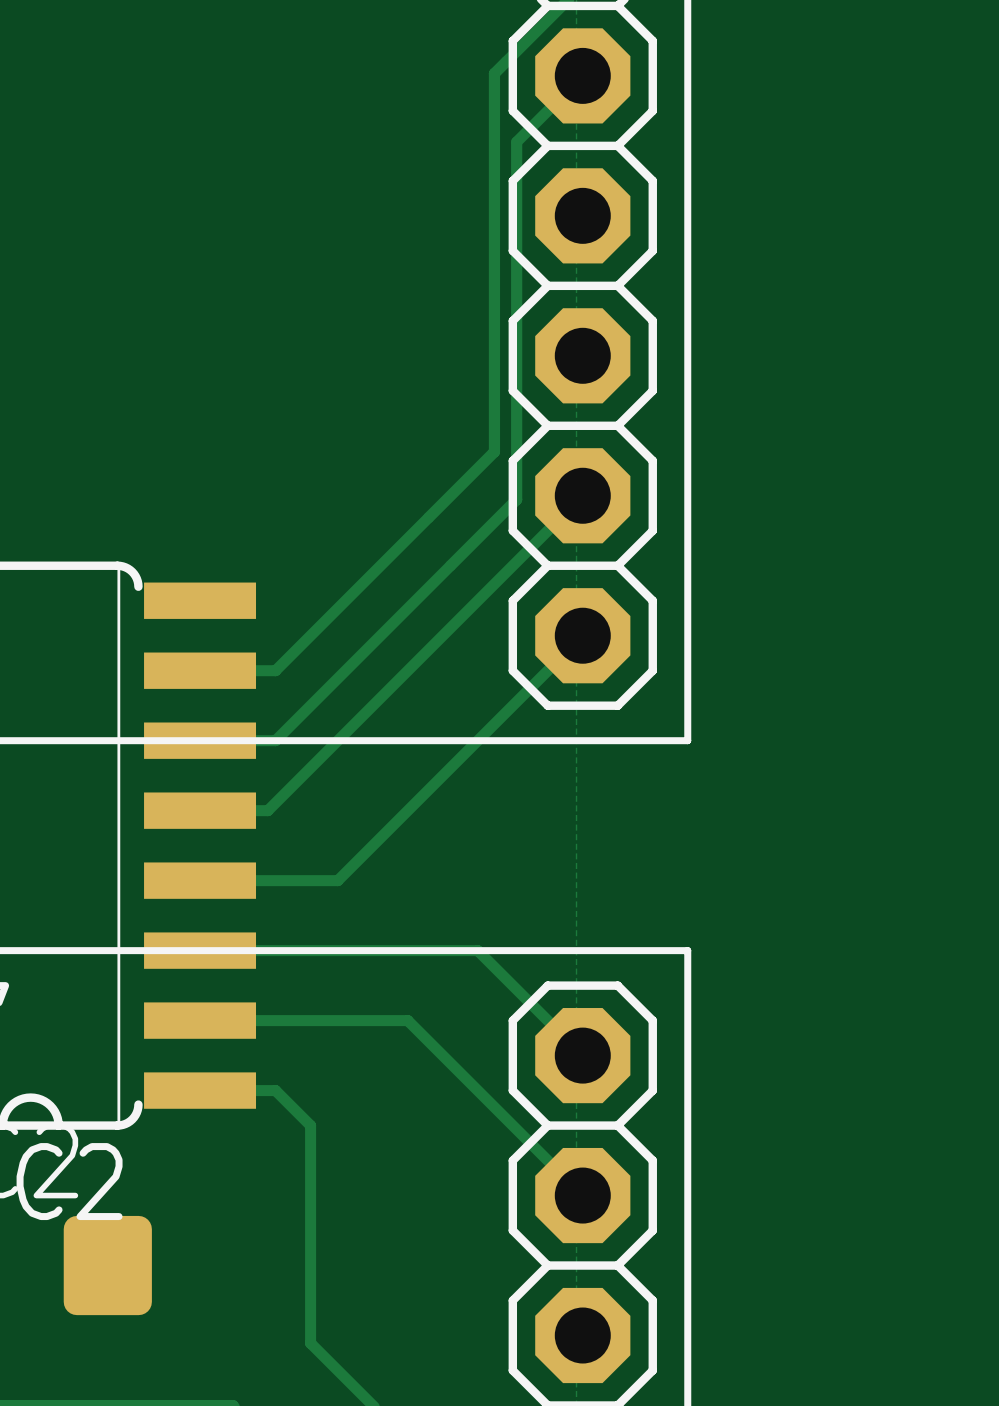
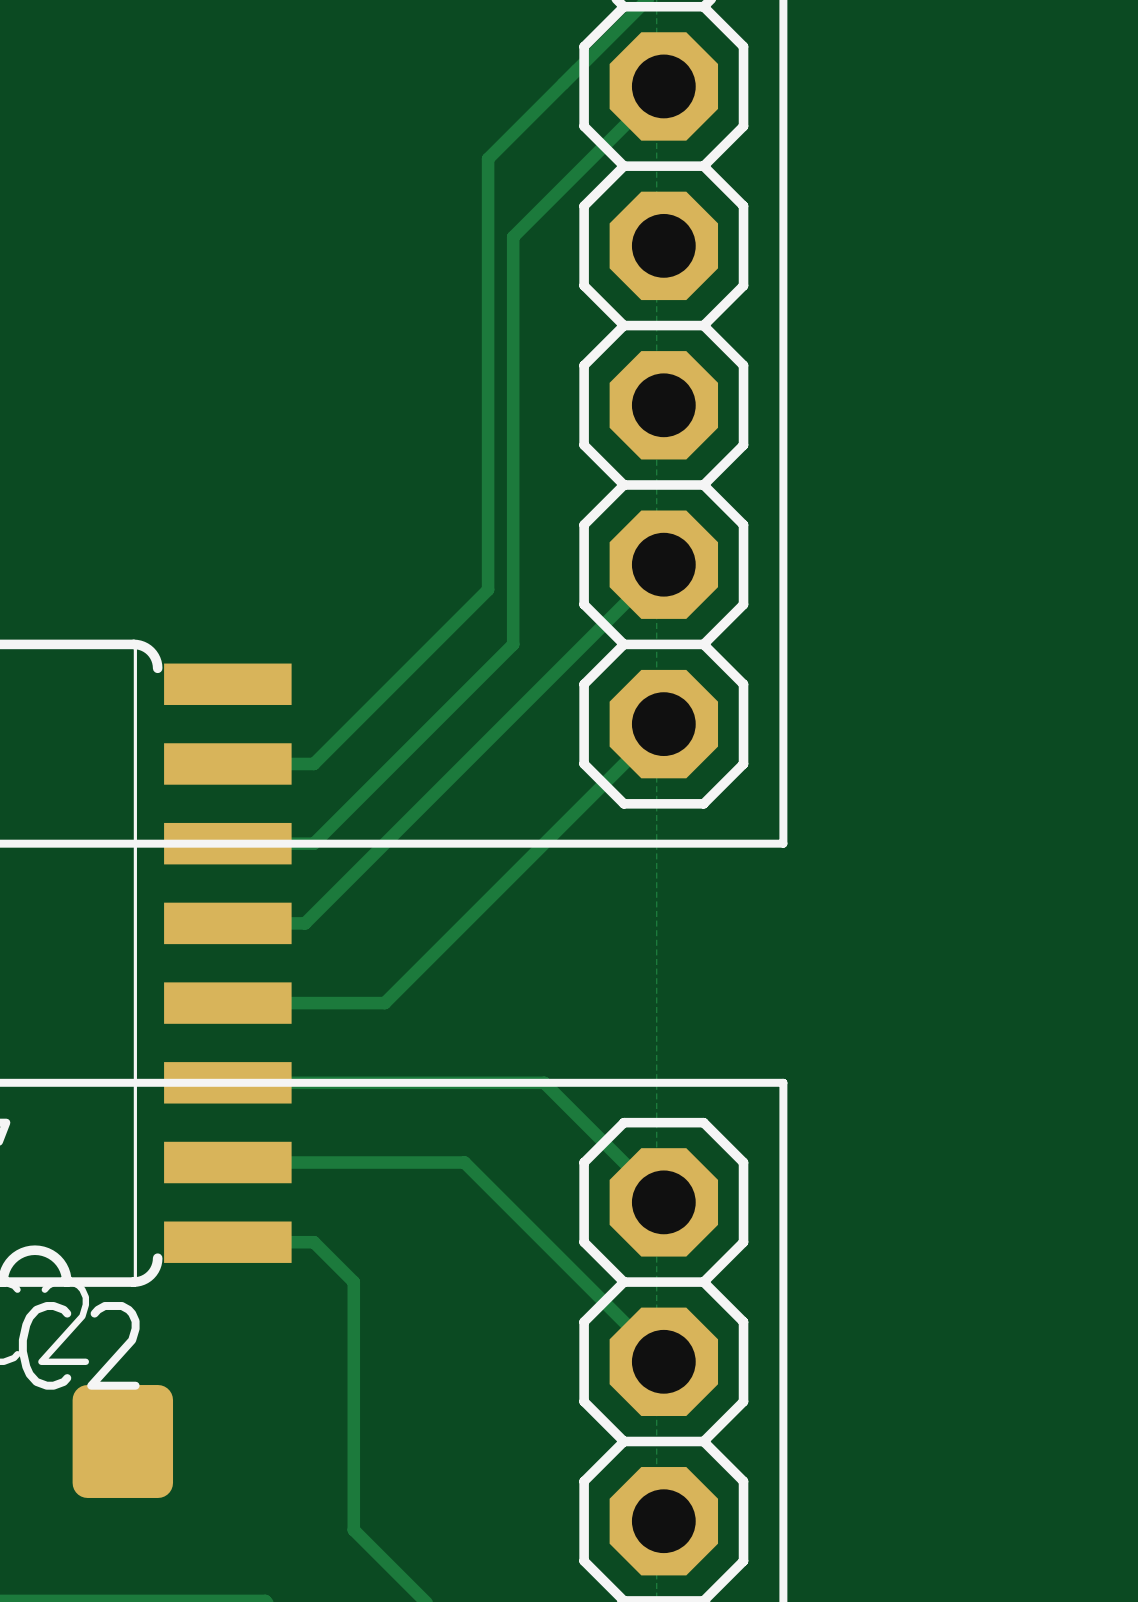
track: (494, 73) (494, 451) (428, 517) -> (563, 83) (488, 158) (488, 589)
track: (516, 142) (516, 499) (450, 565) -> (588, 161) (513, 237) (513, 644)

